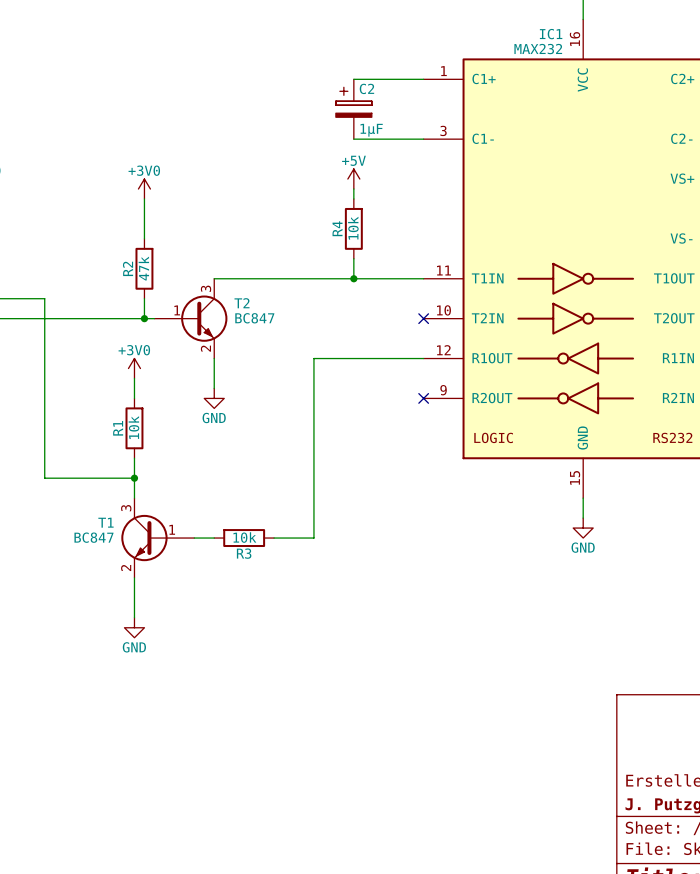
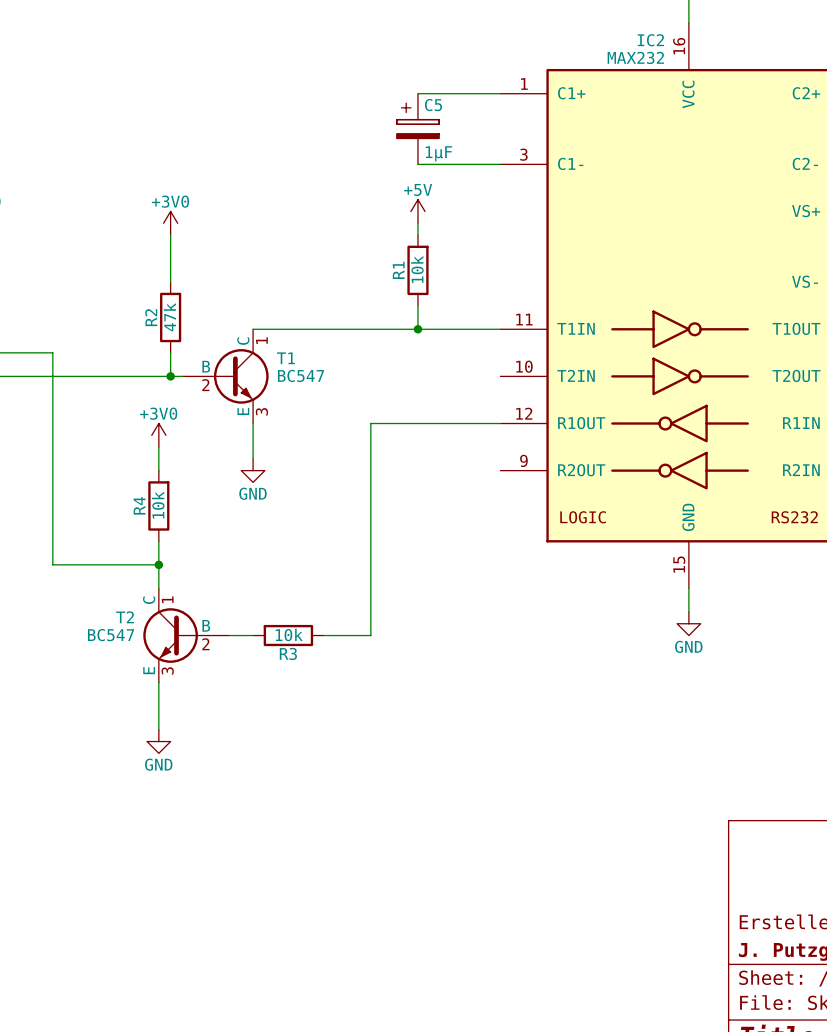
IC1 name: IC1 (551, 34) -> IC2 (650, 40)
C2 name: C2 (366, 88) -> C5 (433, 105)
R4 name: R4 (337, 228) -> R1 (398, 270)
T2 symbol: [154, 278, 228, 359] -> [143, 588, 230, 683]
T2 name position: T2 (242, 303) -> T2 (125, 617)
T2 value: BC847 (254, 318) -> BC547 (111, 635)
no-connect mark: (423, 318) -> none
no-connect mark: (423, 398) -> none
R1 name: R1 (118, 428) -> R4 (139, 505)
T1 symbol: [121, 498, 195, 578] -> [182, 329, 269, 424]
T1 name position: T1 (105, 522) -> T1 (285, 358)
T1 value: BC847 (93, 537) -> BC547 (301, 375)

